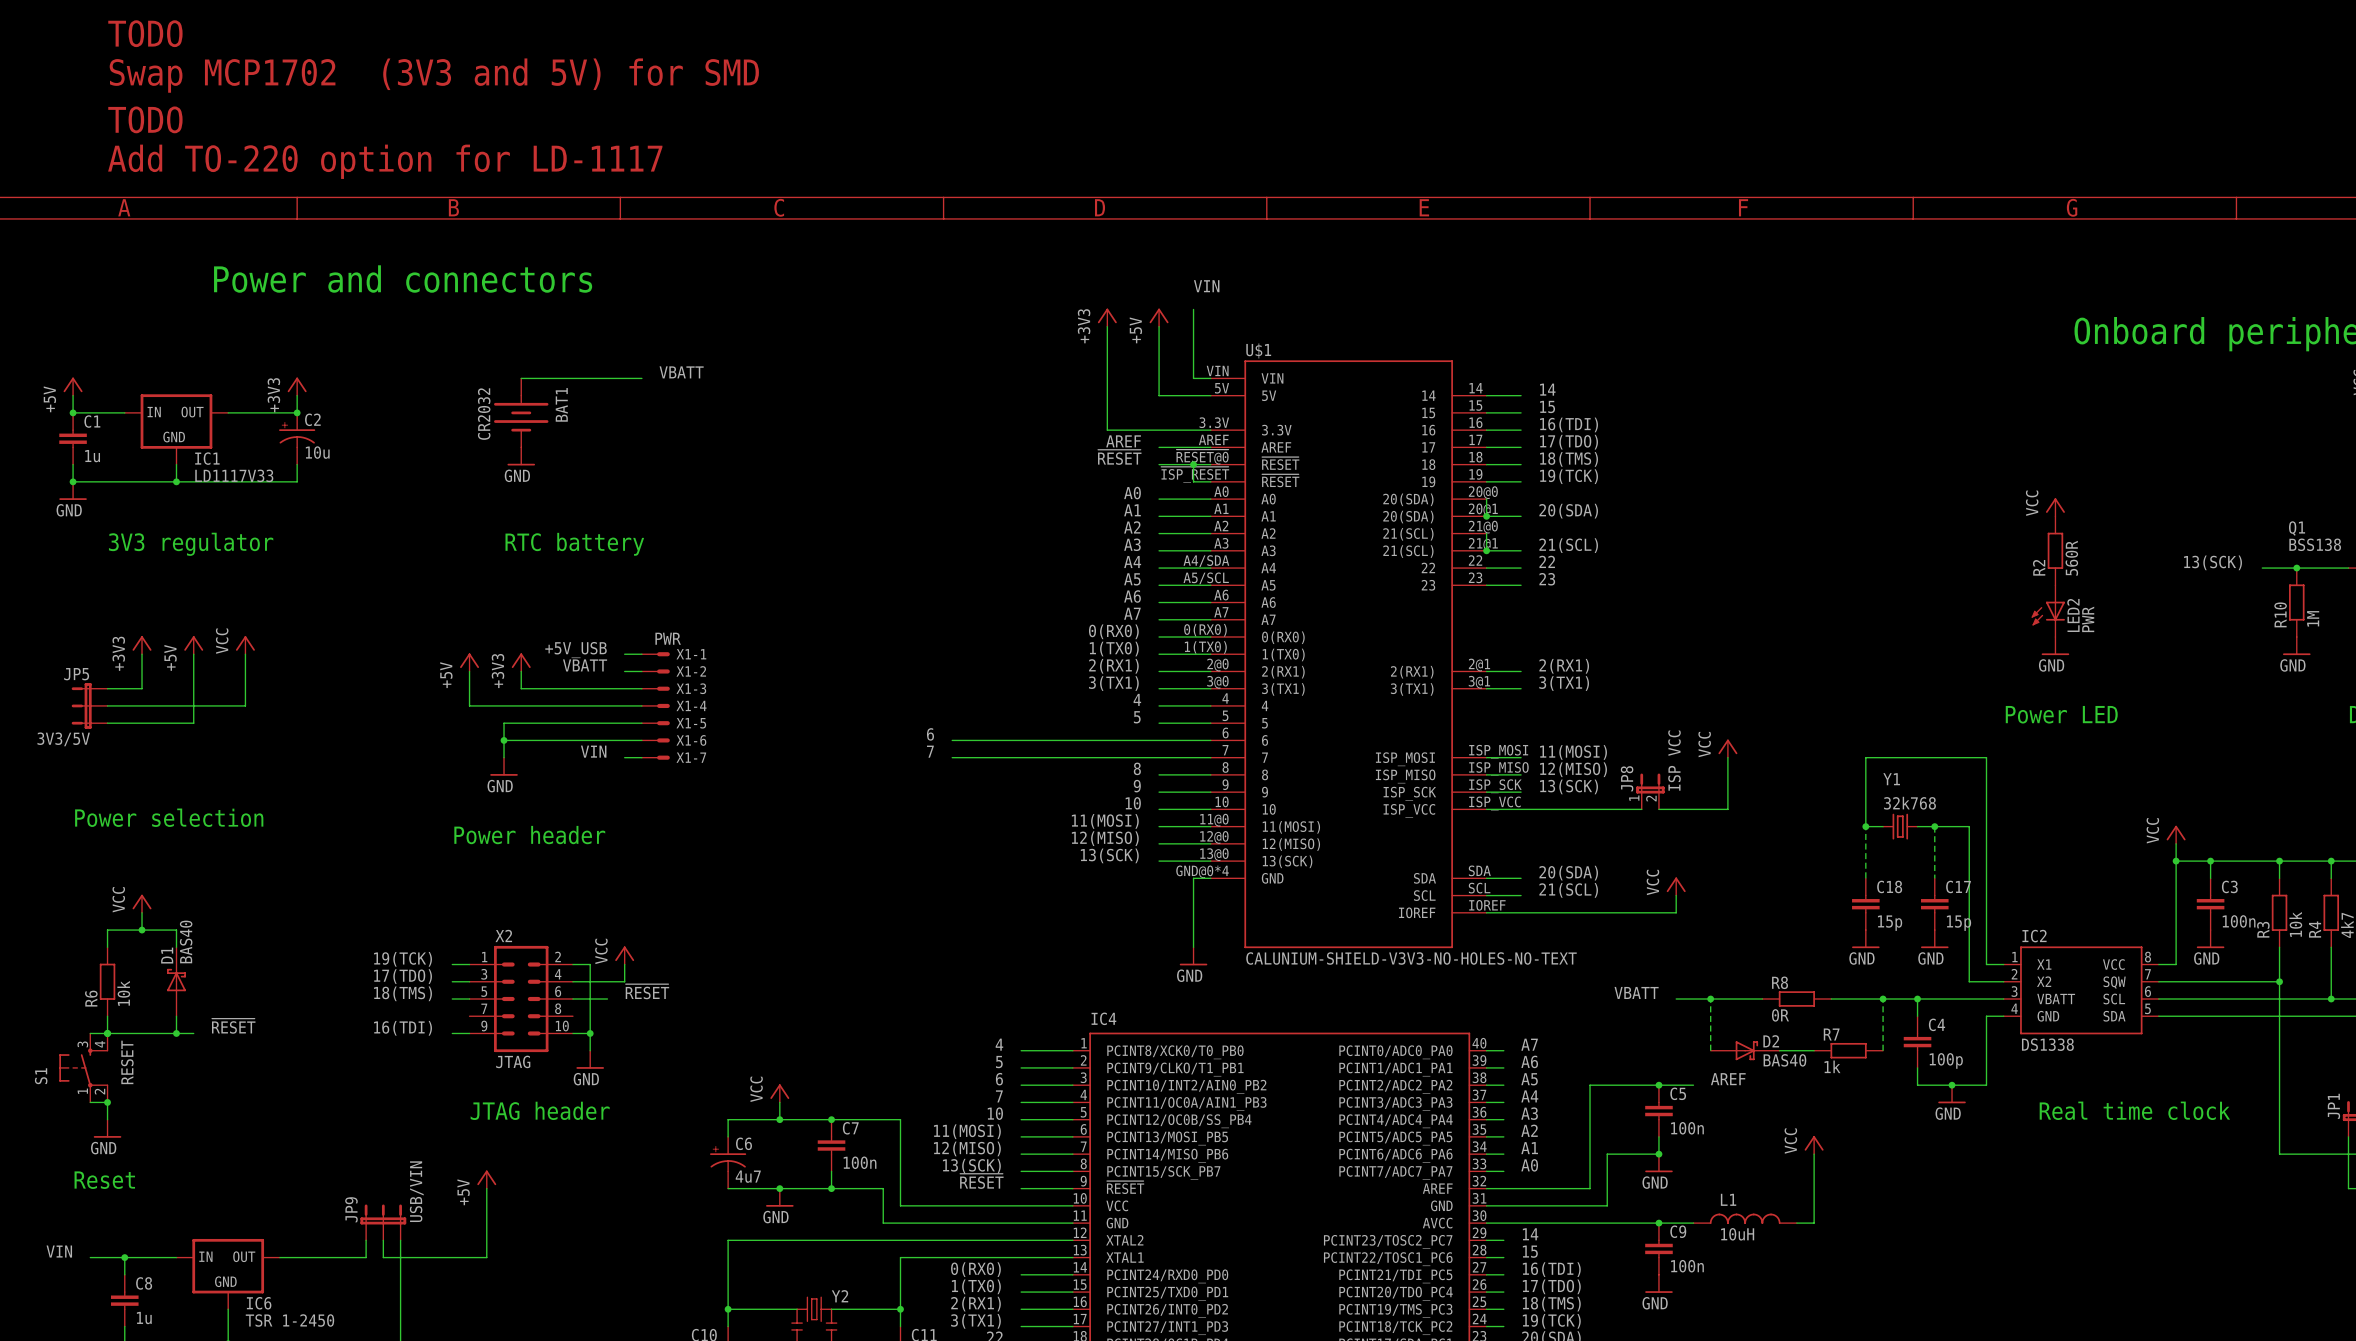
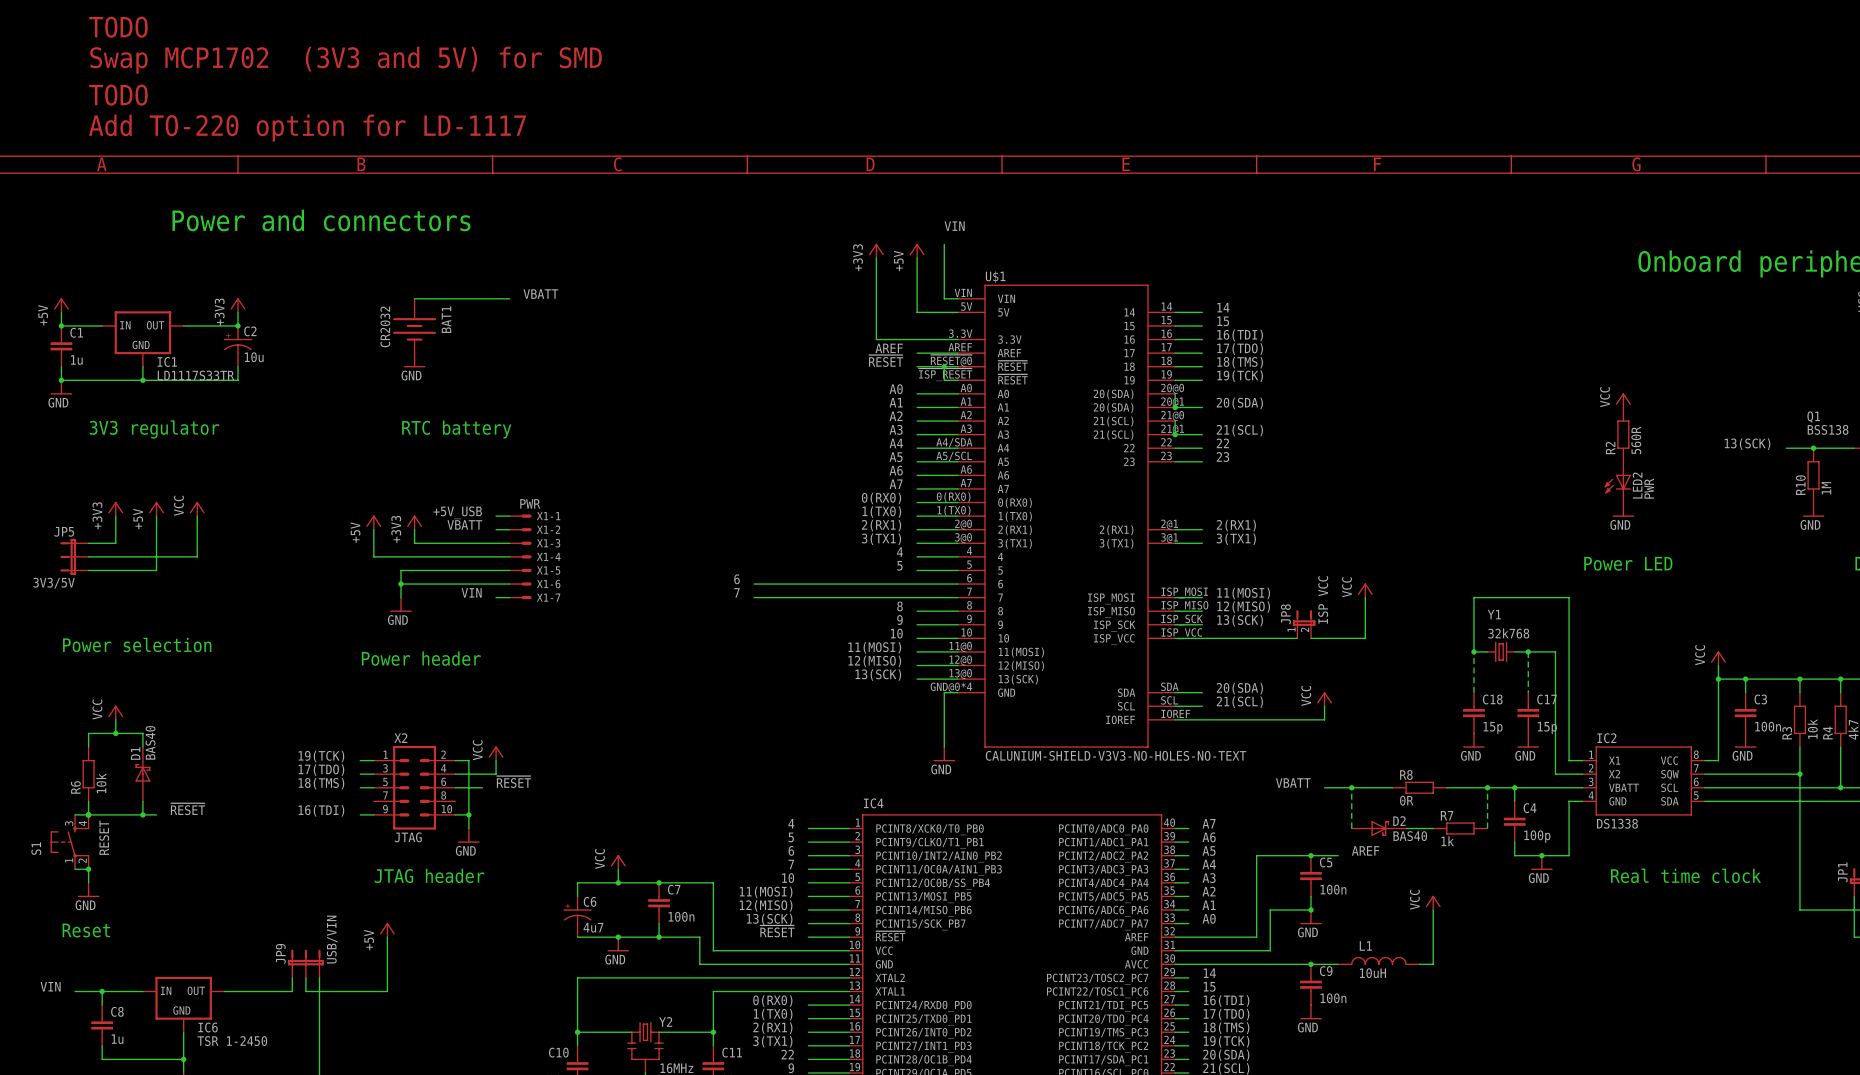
IC1 value: LD1117V33 (234, 475) -> LD1117S33TR (195, 375)

